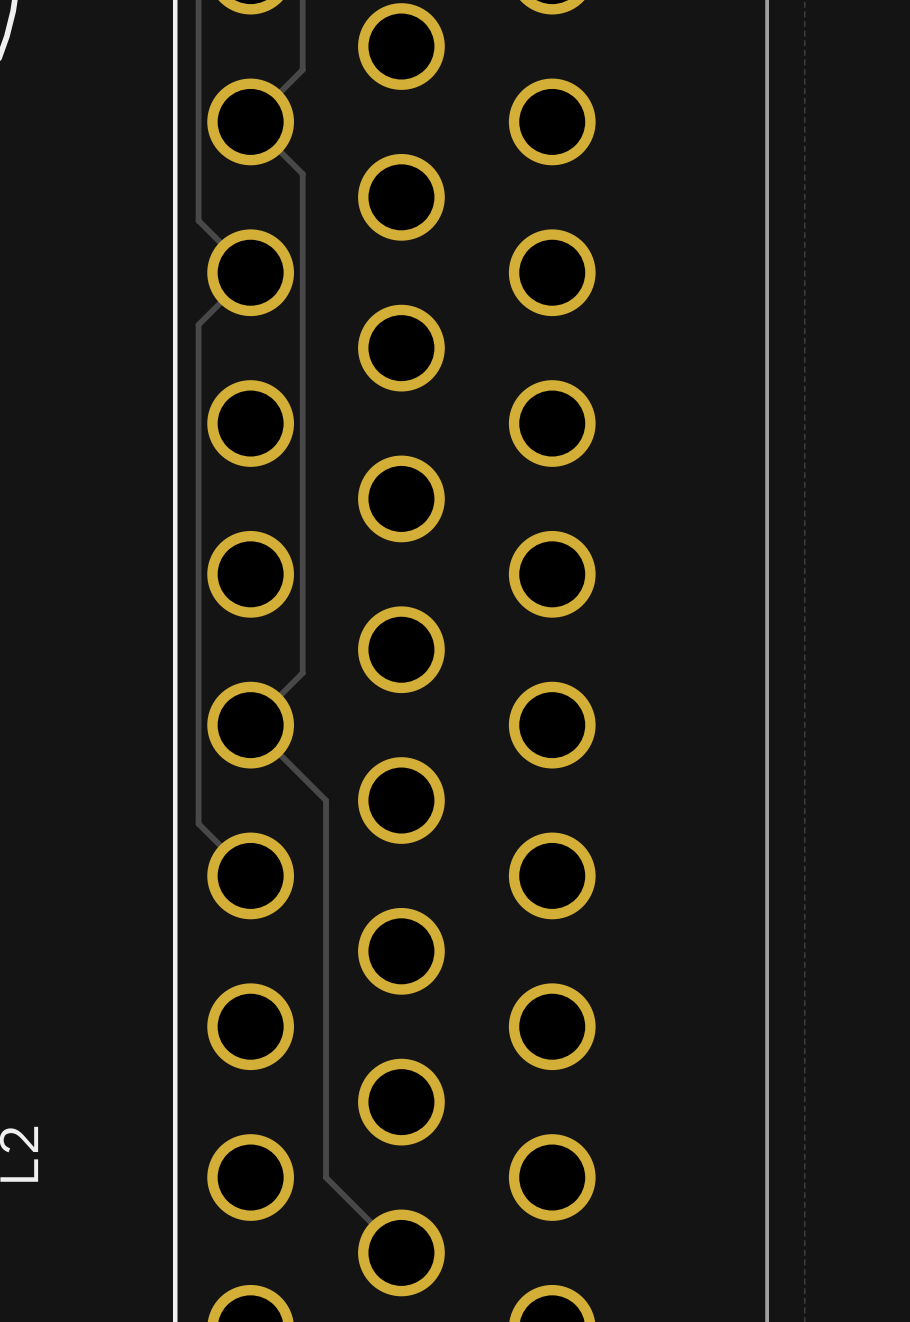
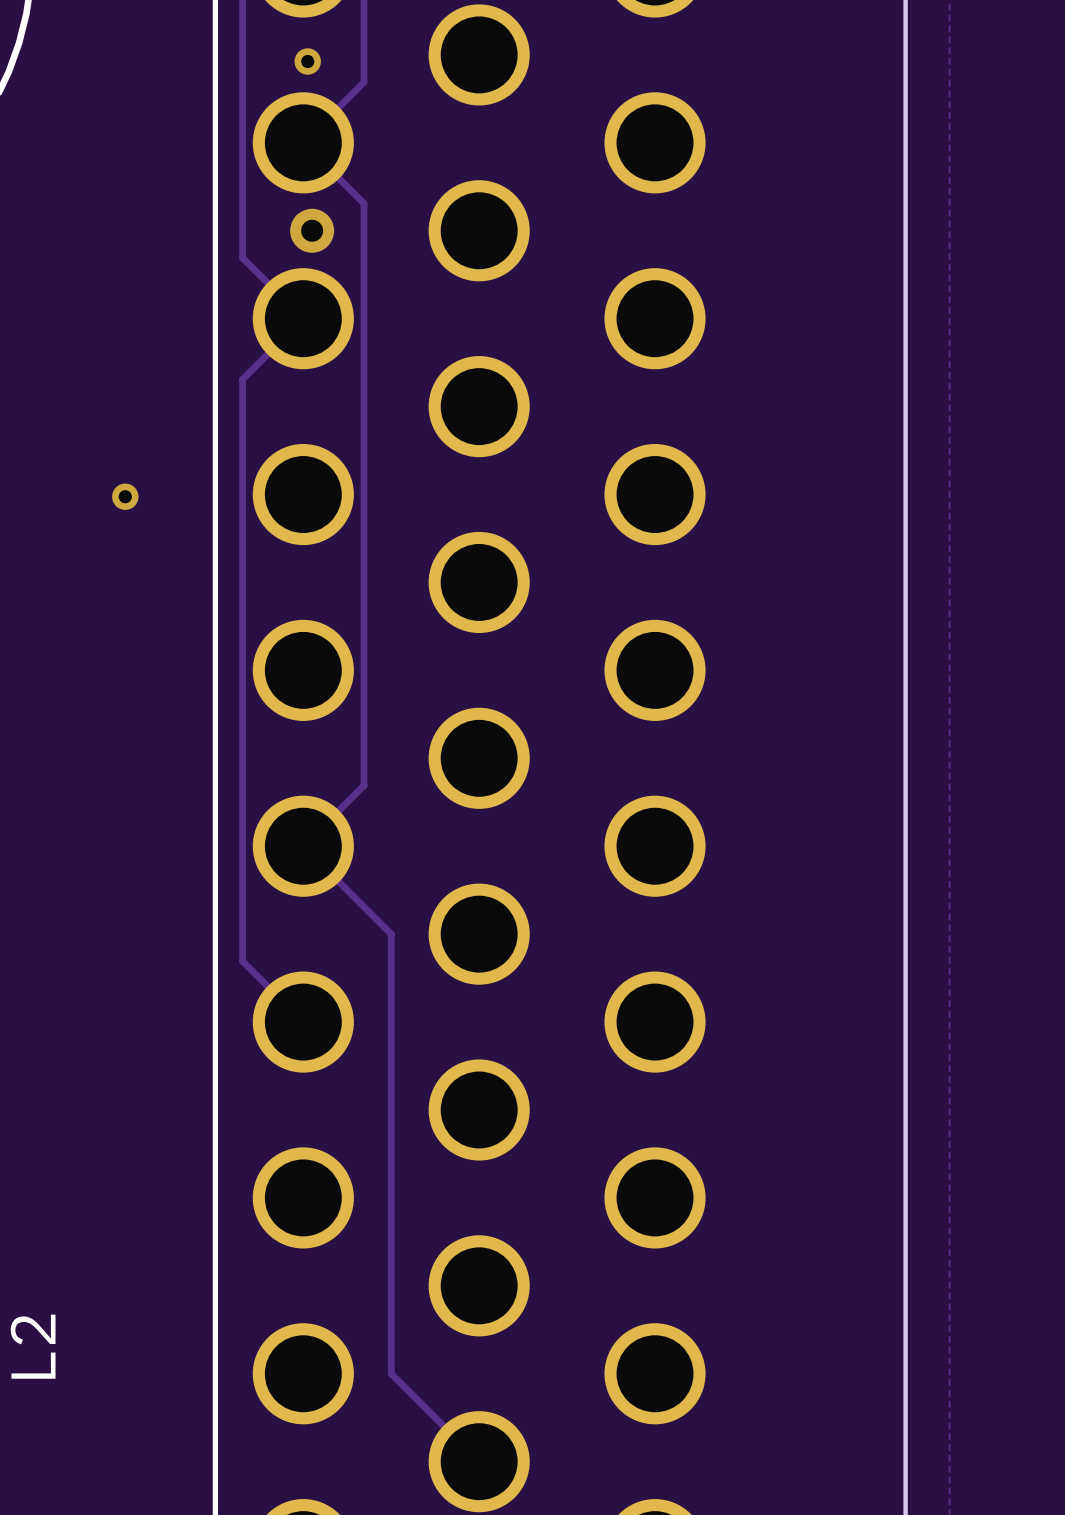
via: none -> (307, 61)
via: none -> (312, 230)
via: none -> (125, 496)

